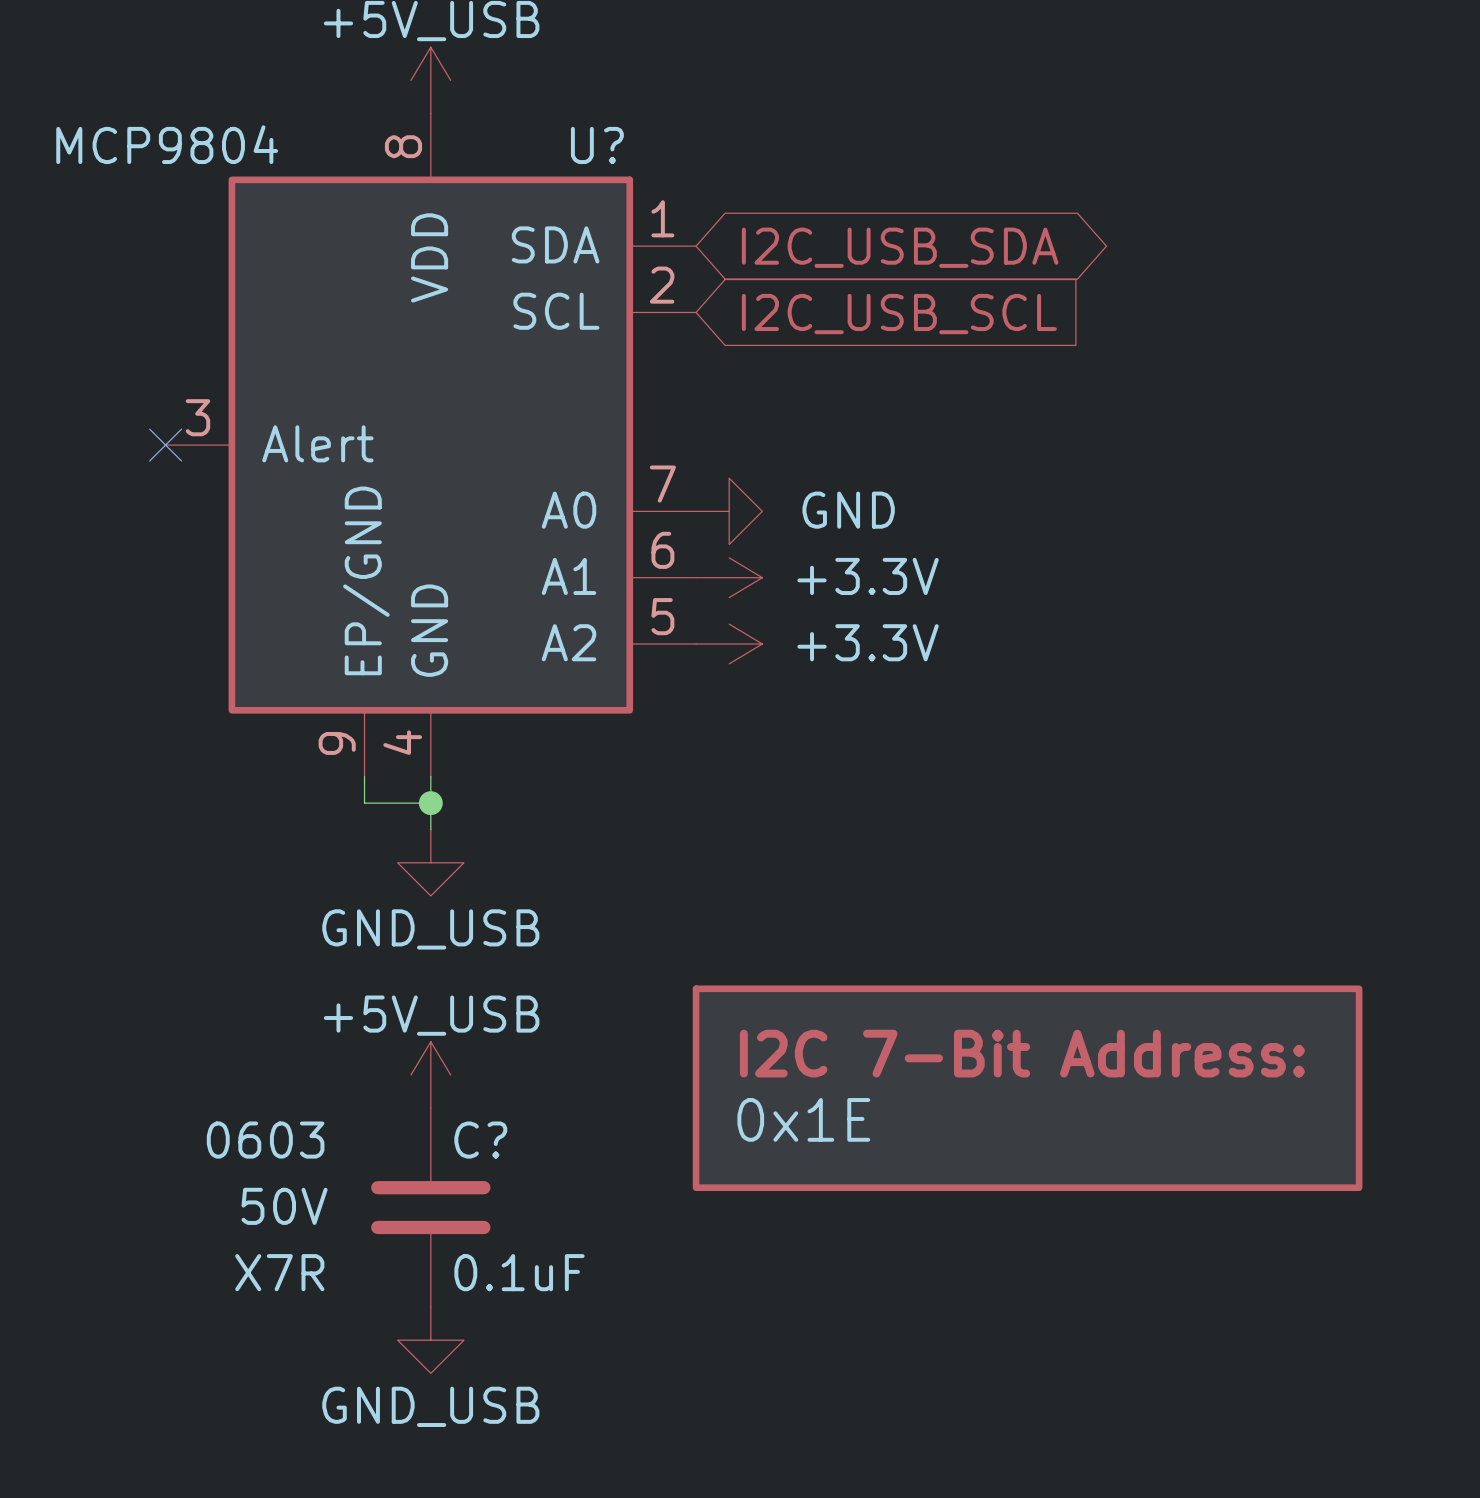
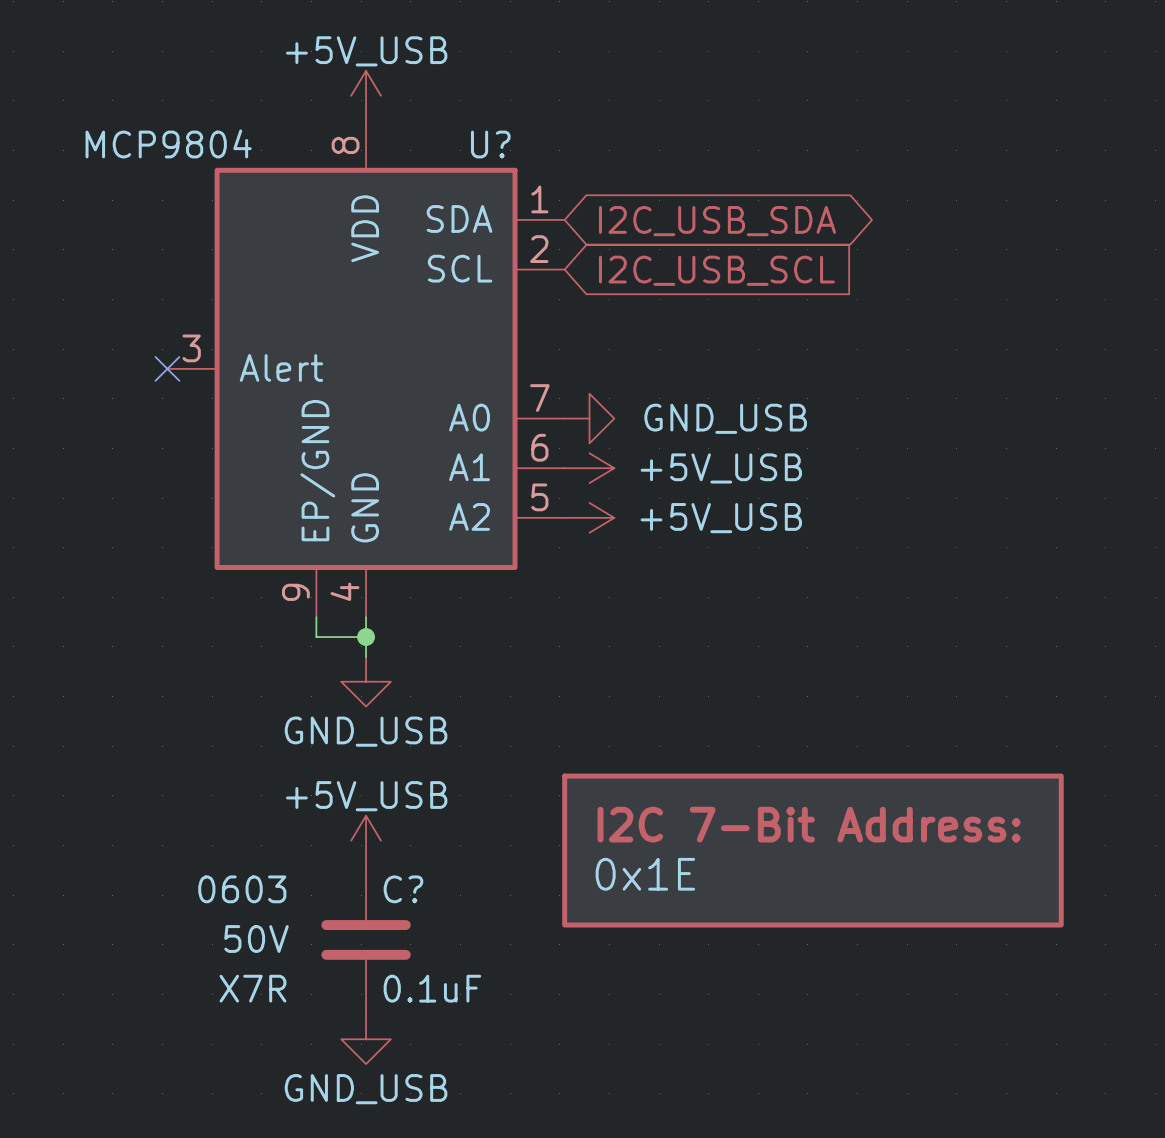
power symbol: GND (729, 511) -> GND_USB (589, 418)
power symbol: +3.3V (729, 577) -> +5V_USB (589, 468)
power symbol: +3.3V (729, 643) -> +5V_USB (589, 517)

